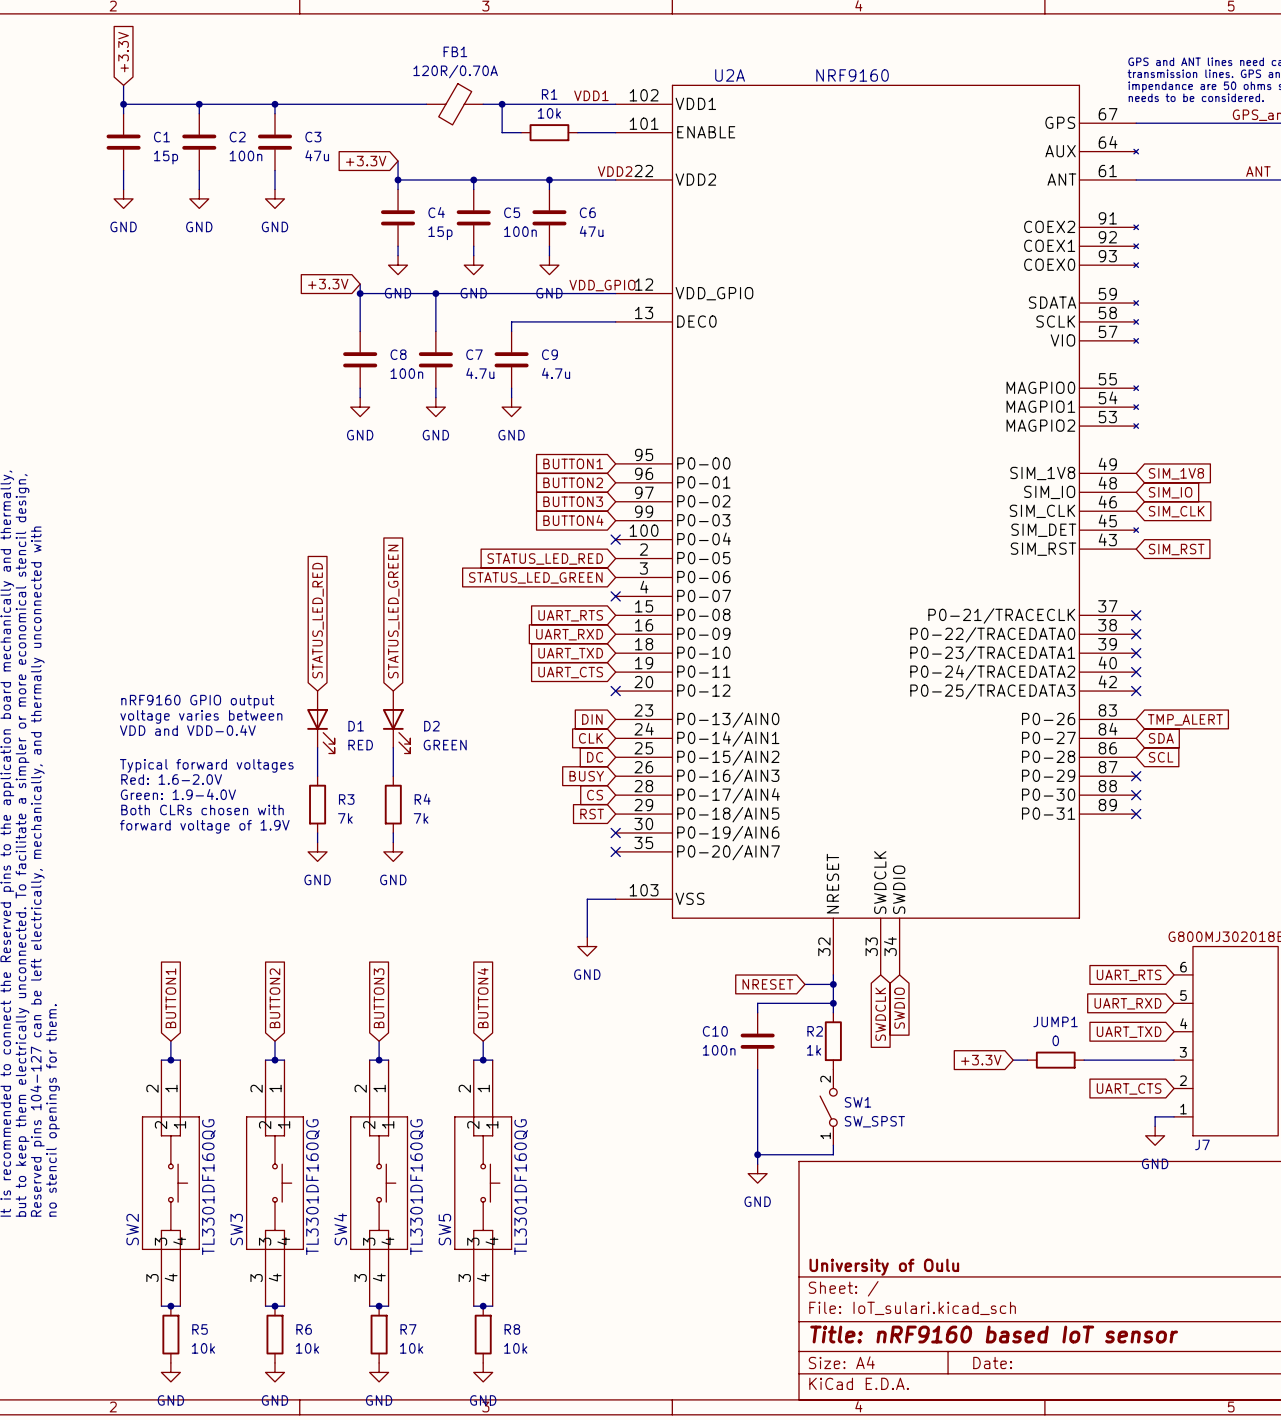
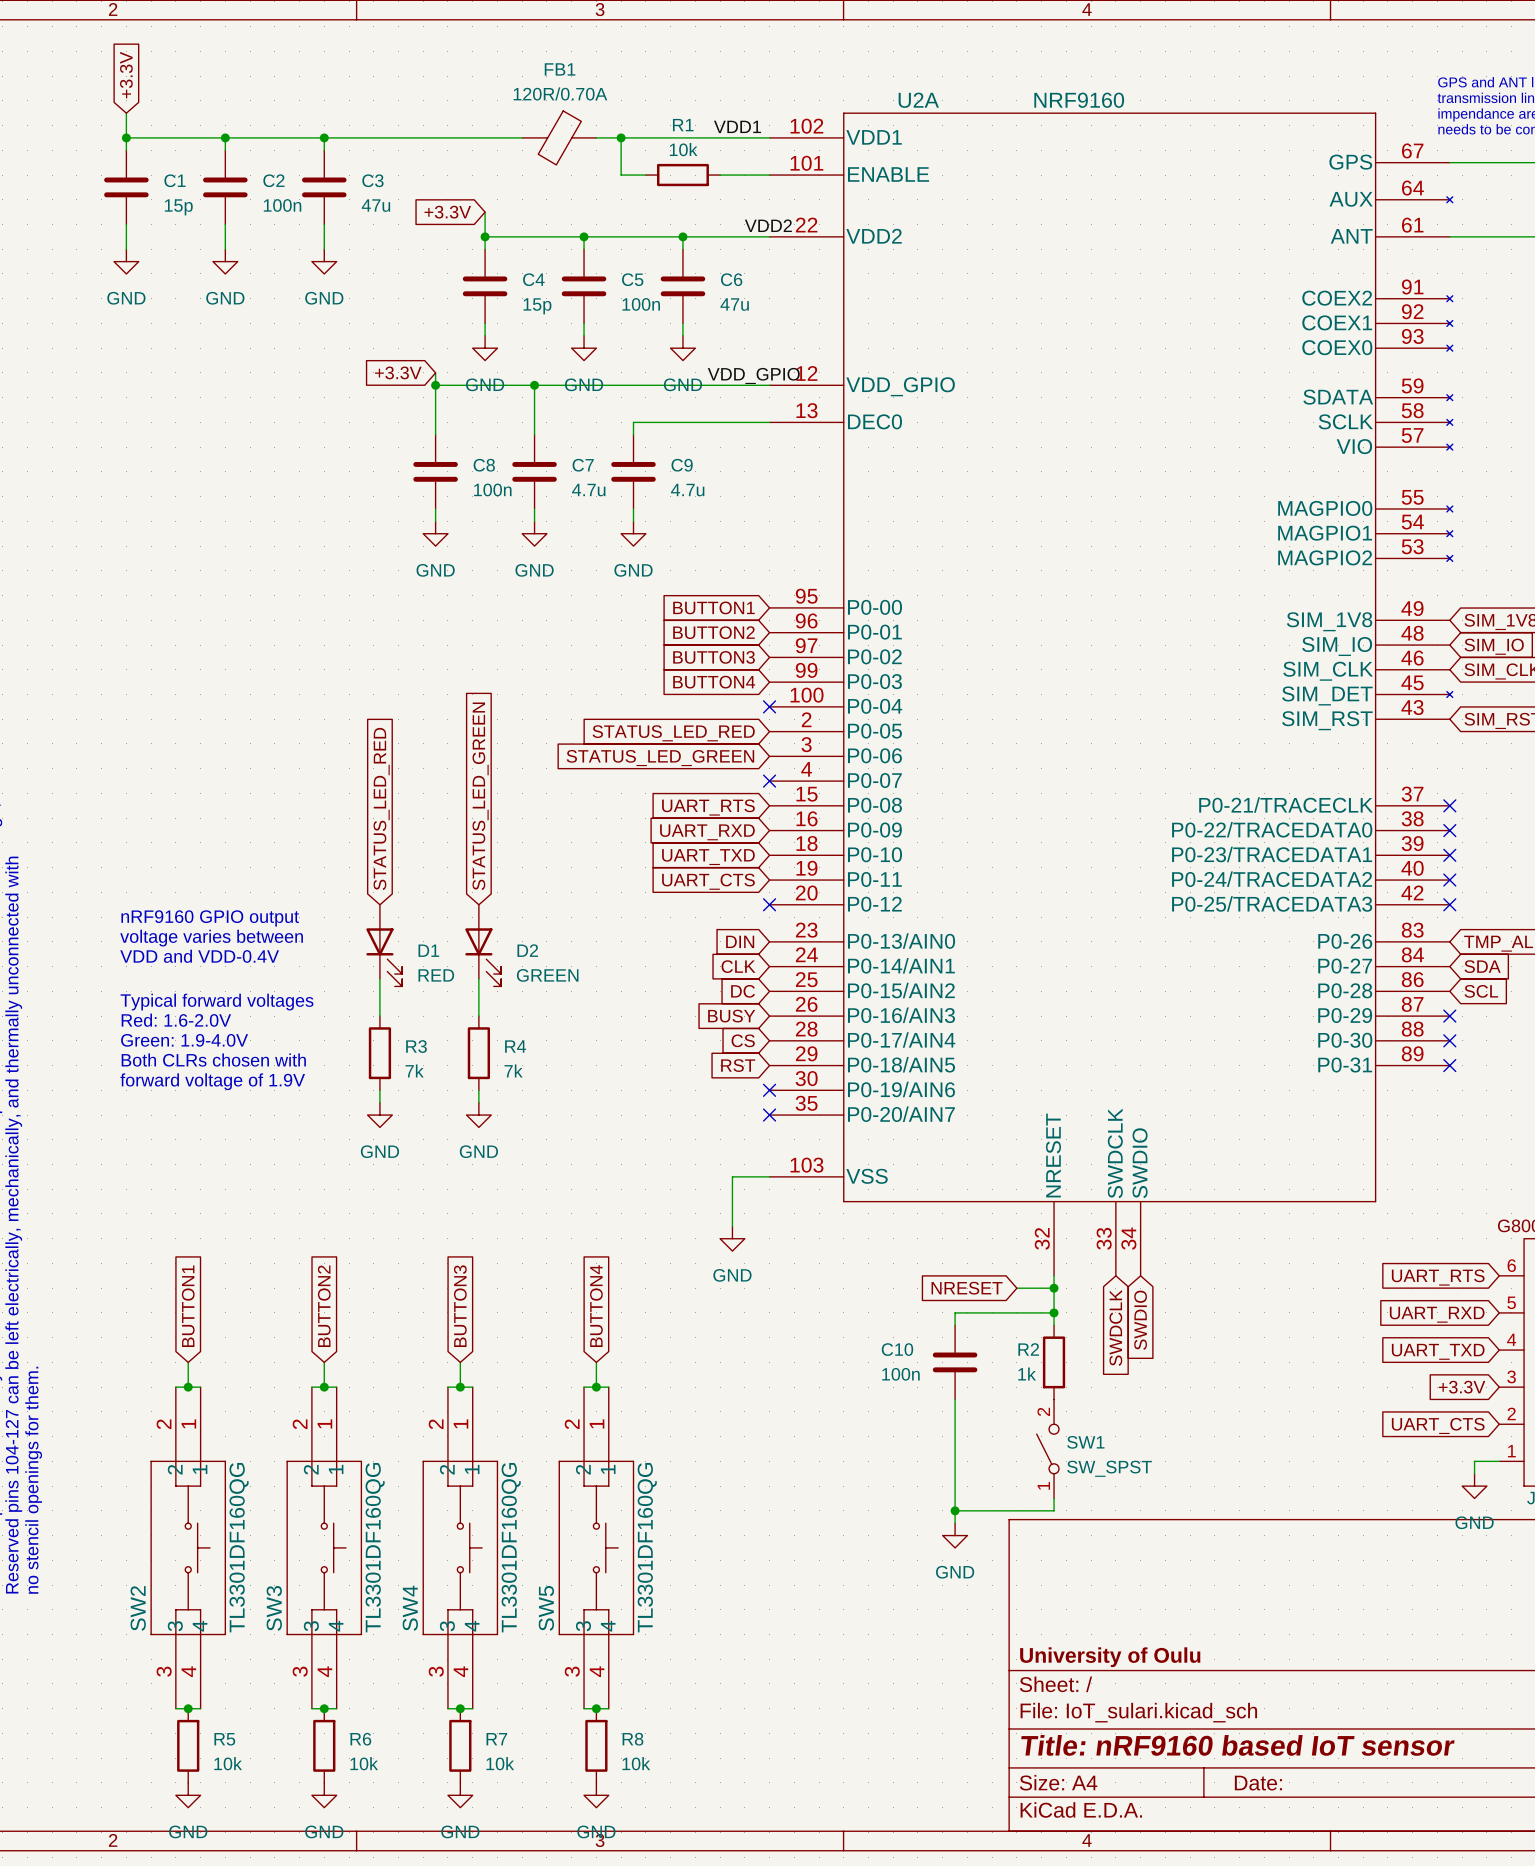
global label position: +3.3V (981, 1060) -> +3.3V (1462, 1387)
wire: (1013, 1060) (1027, 1060) -> none
JUMP1: 0 (1055, 1060) -> none
wire: (1084, 1060) (1174, 1060) -> none

